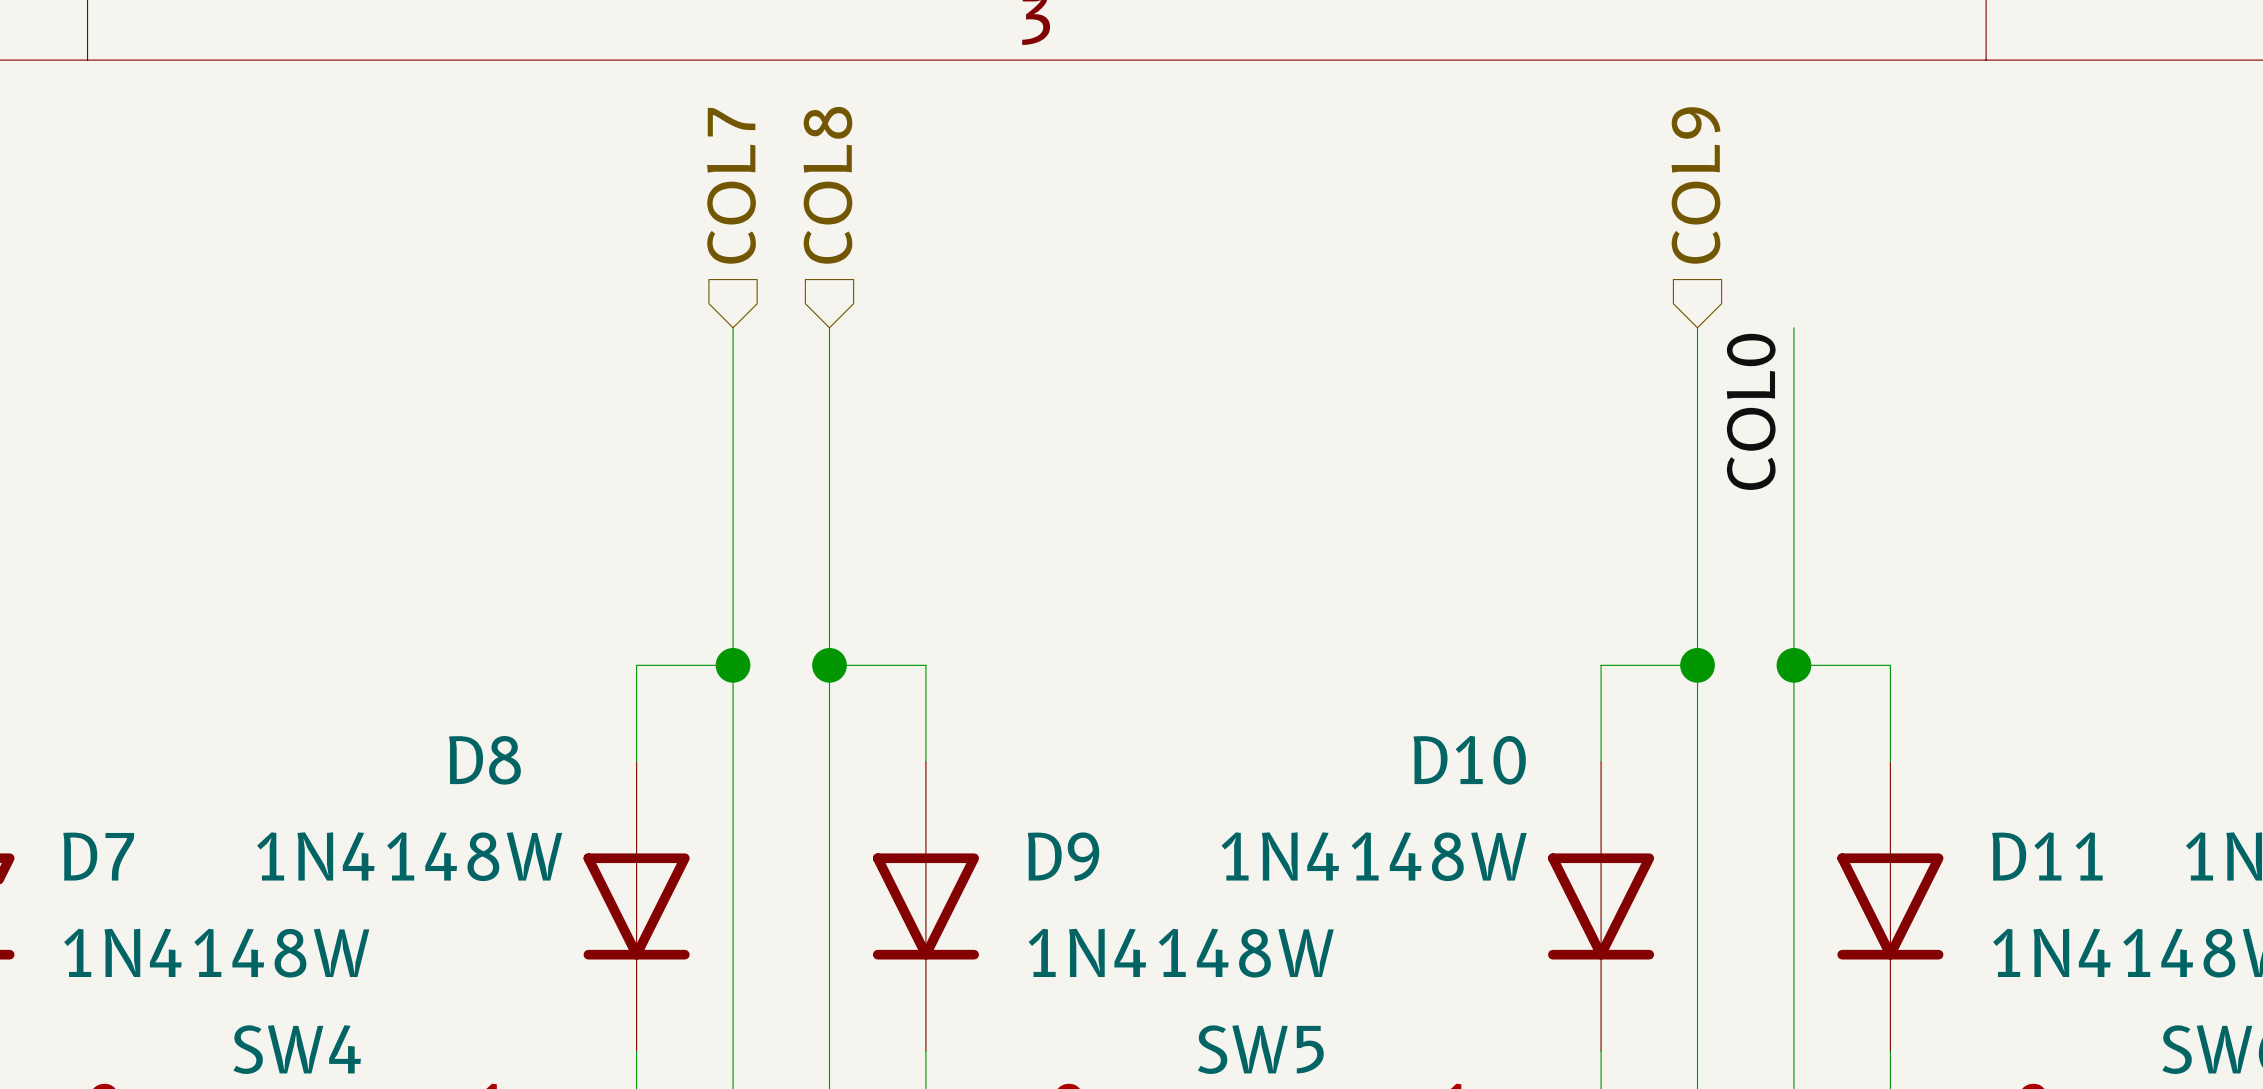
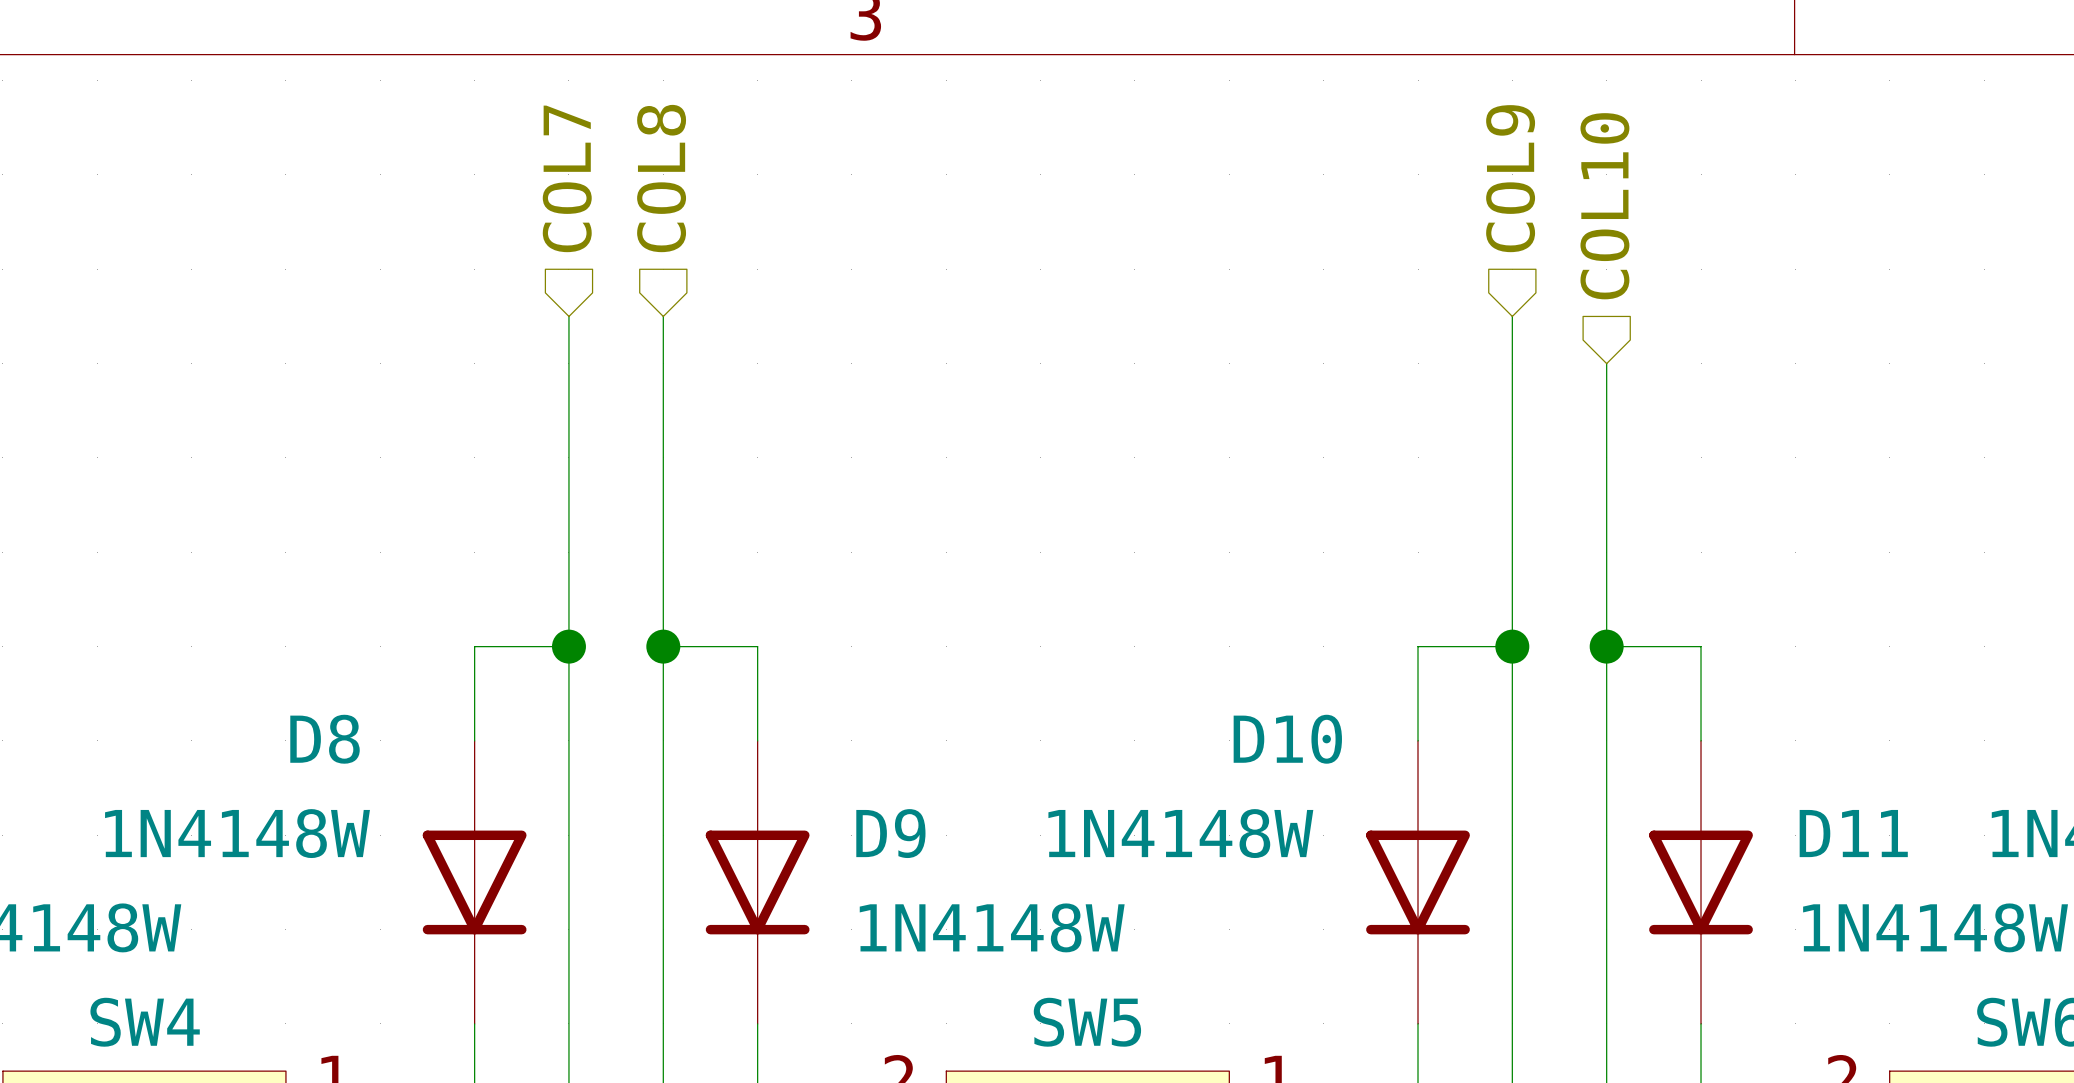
hierarchical label: none -> COL10 (1604, 206)
wire: (1793, 327) (1793, 376) -> none
label: COL0 (1751, 411) -> none

